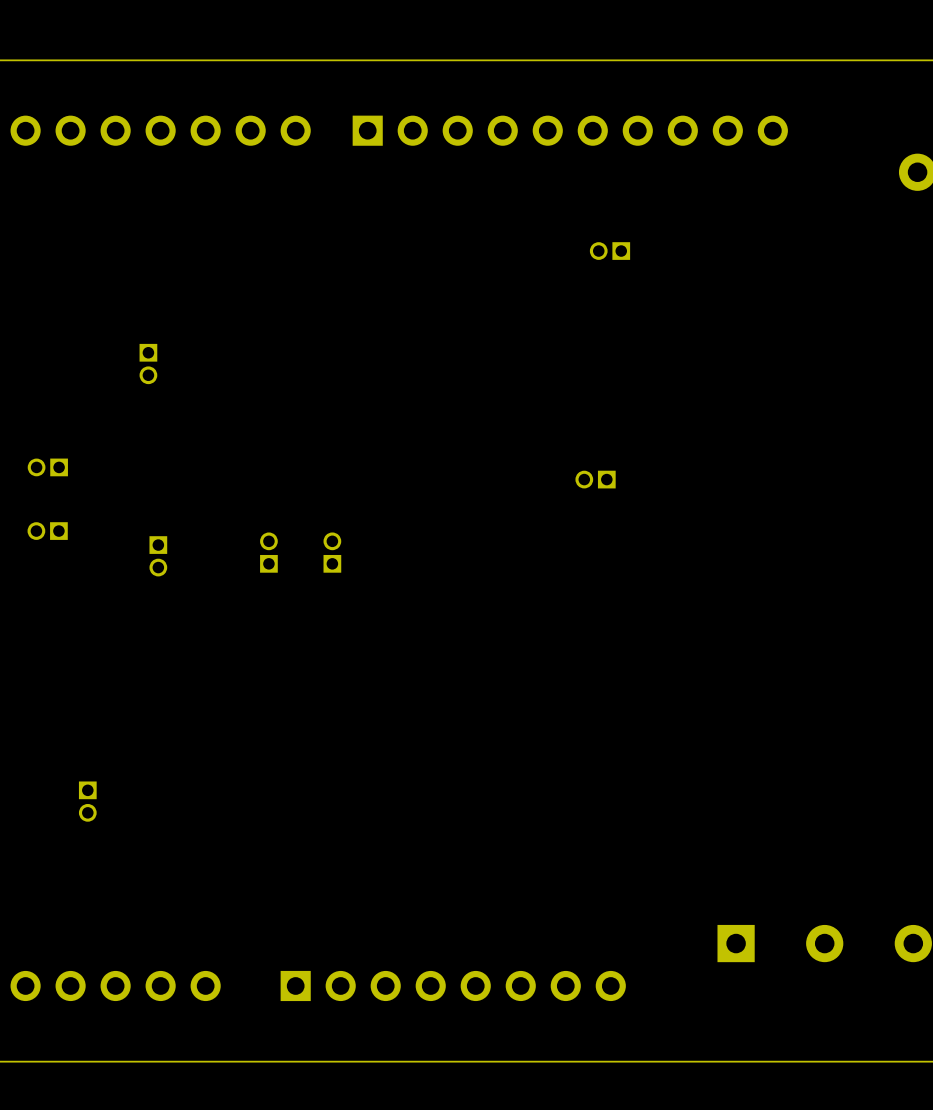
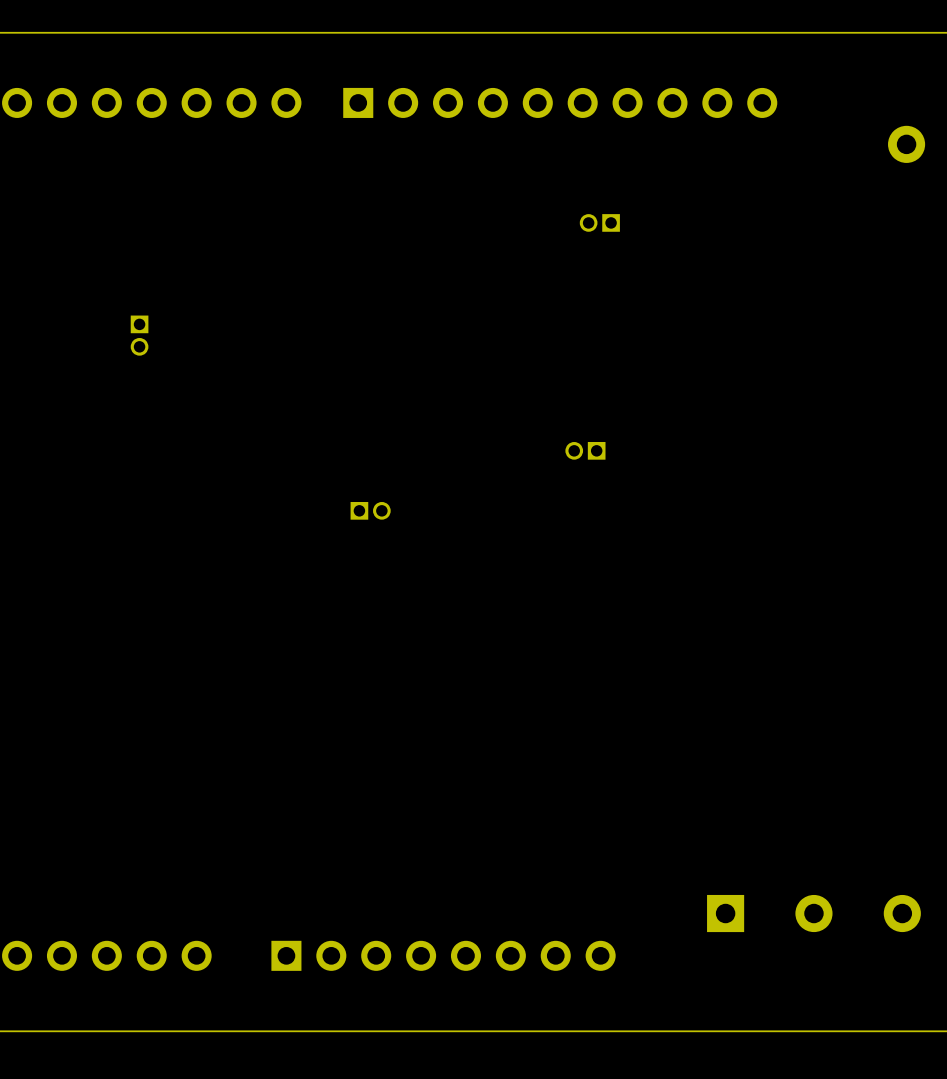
part: (47, 467) -> none
part: (47, 531) -> none
part: (268, 552) -> none
part rotation: 0° (332, 552) -> 90° clockwise (370, 510)
part position: (332, 552) -> (370, 510)
part: (158, 556) -> none
part: (87, 801) -> none

